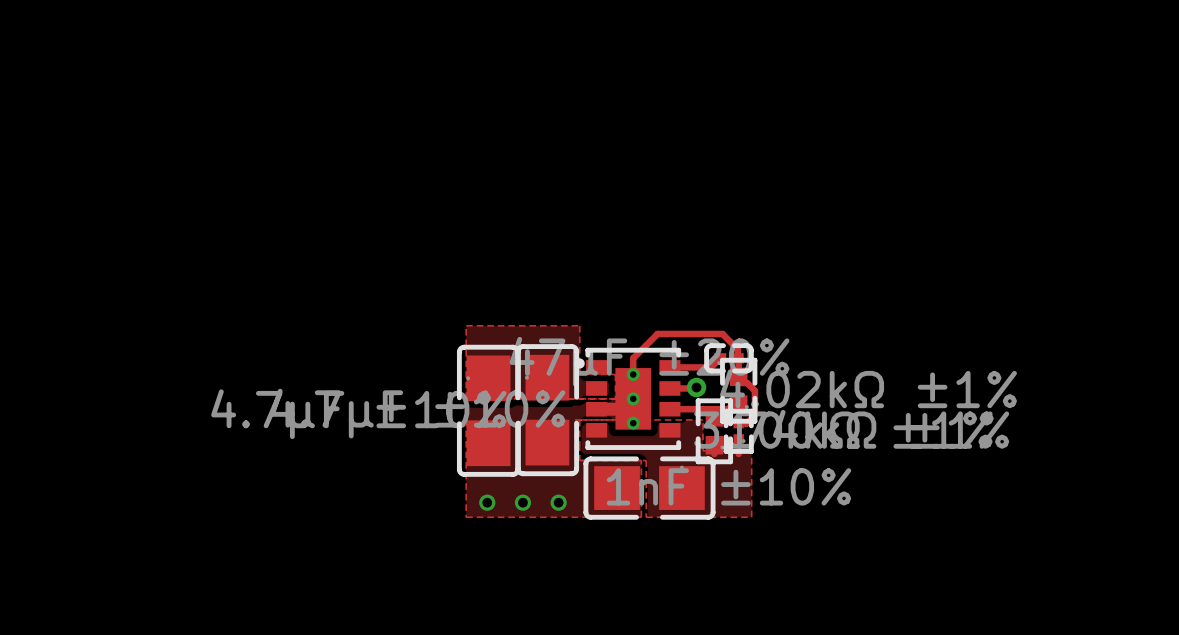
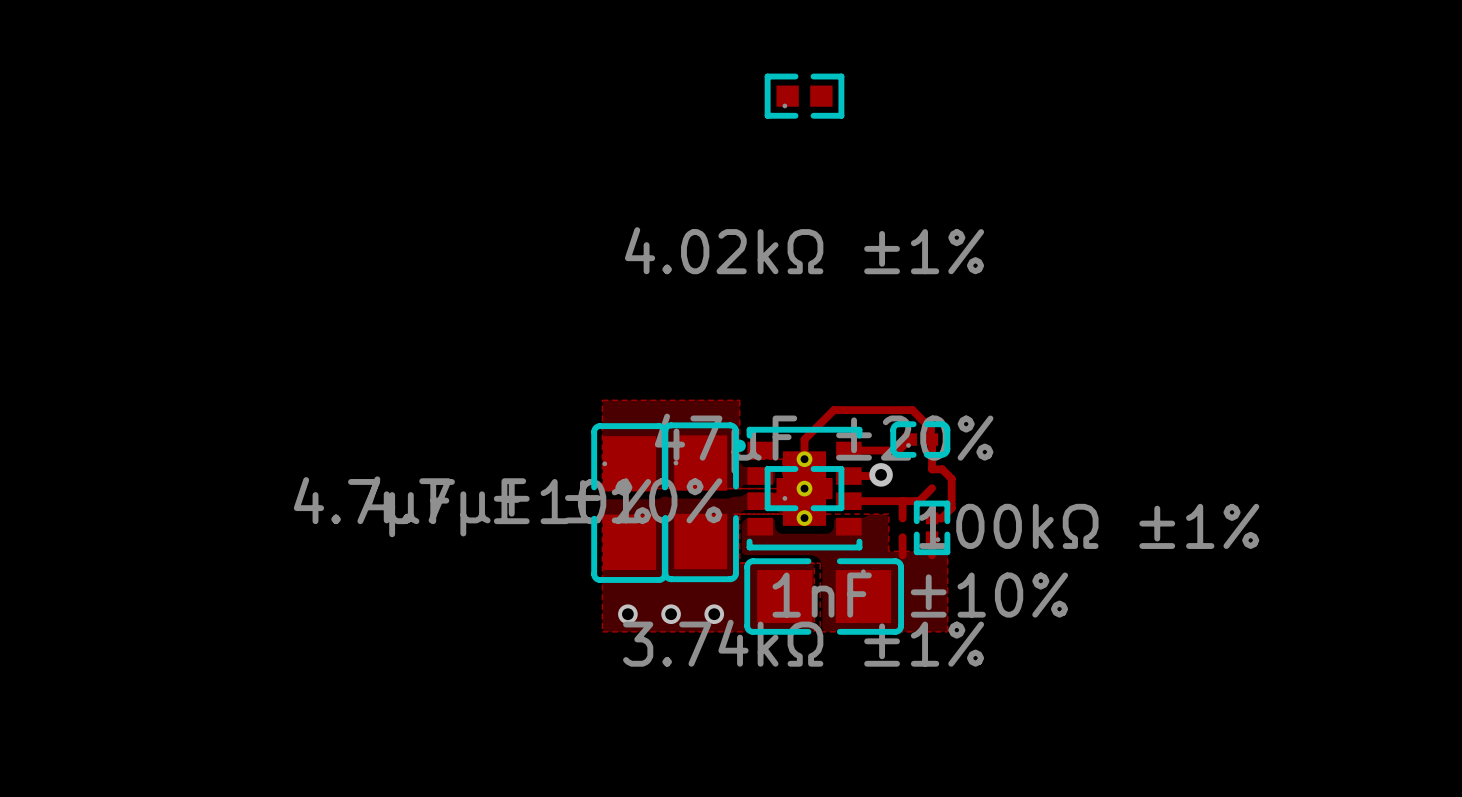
part rotation: 0° (738, 390) -> 90° clockwise (804, 96)
part position: (738, 390) -> (804, 96)
part rotation: 0° (714, 431) -> 90° clockwise (804, 488)
part position: (714, 431) -> (804, 488)

